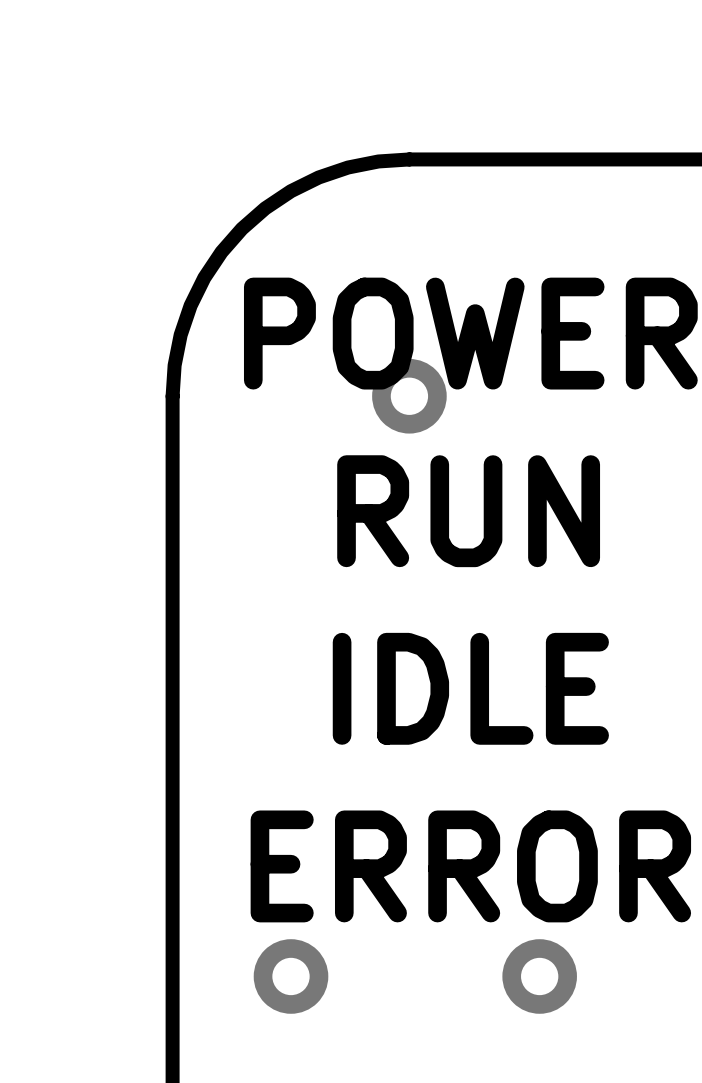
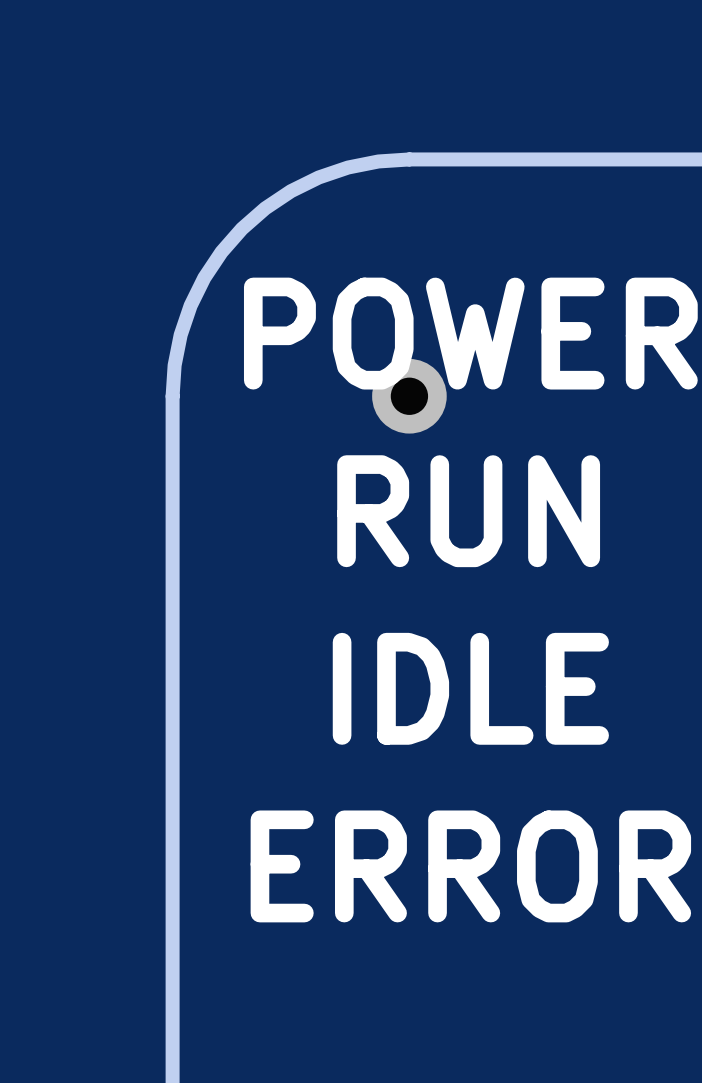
via: (291, 976) -> none
via: (539, 976) -> none

